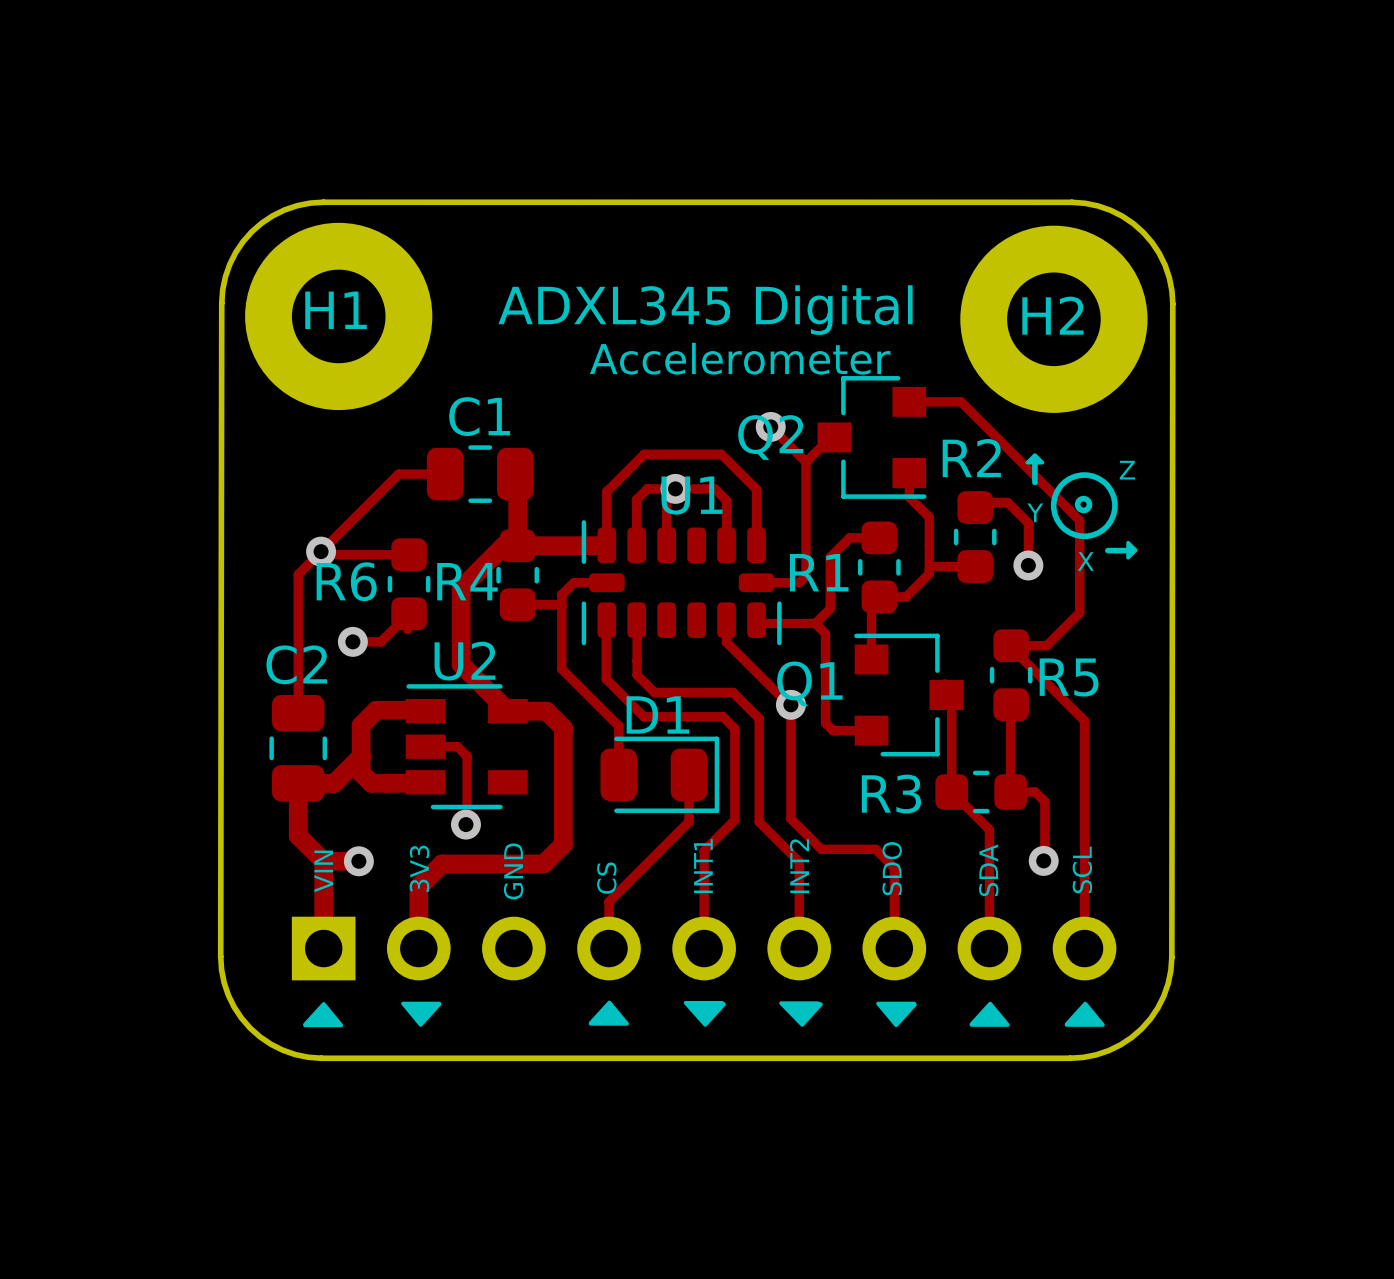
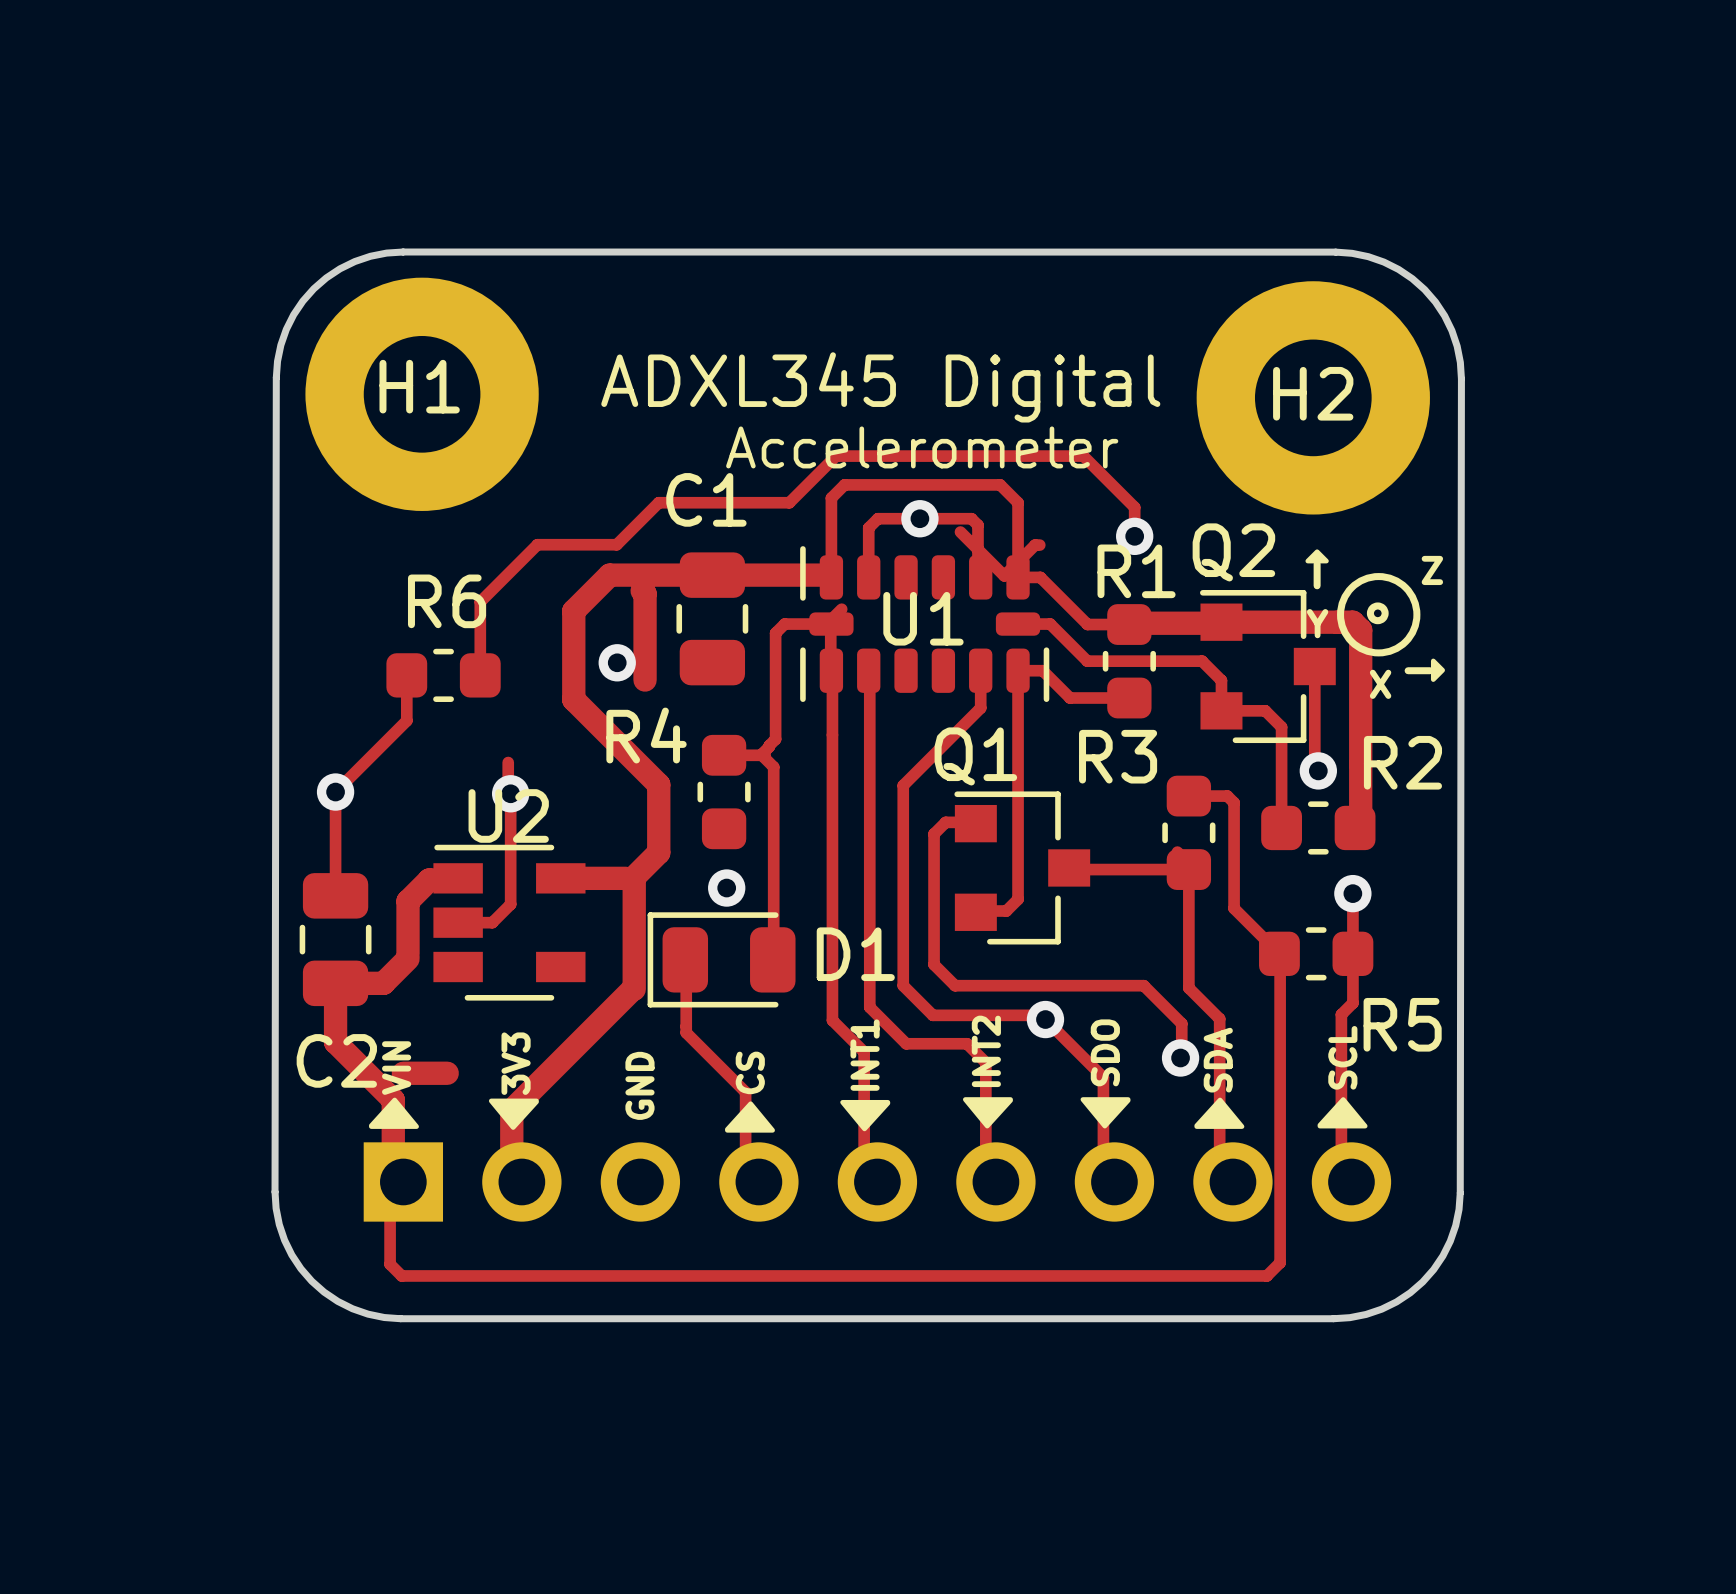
track: (909, 401) (960, 401) (1079, 520) (1079, 612) (1046, 645) (1011, 645) -> none
via position: (770, 426) -> (919, 518)
track: none -> (1134, 536) (1134, 507) (1083, 456) (836, 456) (789, 502) (658, 502) (616, 544) (537, 544) (480, 601) (480, 675)
via: none -> (1134, 536)
Q2 name position: Q2 (770, 437) -> Q2 (1233, 552)
Q2 rotation: 0° (872, 437) -> 180° (1267, 666)
Q2 position: (872, 437) -> (1267, 666)
drawing position: (1034, 458) -> (1317, 556)
track: (805, 462) (805, 575) (799, 582) (756, 582) -> none
track: none -> (868, 577) (868, 527) (877, 518) (971, 518) (977, 525) (977, 574) (980, 577)
line: (1034, 464) (1034, 482) -> (1317, 563) (1317, 585)
text position: Z (1127, 470) -> Z (1432, 570)
track: (909, 472) (909, 497) (929, 517) (929, 573) (906, 596) (879, 596) (871, 604) (871, 659) -> none
track: (445, 474) (398, 474) (298, 574) (298, 713) -> none
C1 rotation: 0° (480, 474) -> 90° clockwise (712, 618)
C1 position: (480, 474) -> (712, 618)
via: (675, 488) -> none
U1 name position: U1 (691, 495) -> U1 (923, 618)
track: none -> (811, 624) (784, 624) (775, 633) (775, 739) (762, 754) (773, 767) (773, 935)
track: none -> (1129, 623) (1352, 622) (1360, 630) (1360, 822) (1355, 827)
track: none -> (1129, 624) (1087, 624) (1040, 577) (1018, 577) (1018, 502) (1000, 484) (844, 484) (831, 498) (831, 577) (829, 575) (609, 575) (573, 611) (573, 699) (658, 784) (658, 852) (633, 878)
track: (982, 502) (1007, 502) (1028, 523) (1028, 565) -> none
track: none -> (1022, 628) (1018, 624) (1050, 624) (1087, 661) (1202, 661) (1221, 680) (1221, 710) (1265, 710) (1281, 727) (1281, 827)
drawing position: (1083, 504) -> (1377, 613)
drawing position: (1084, 505) -> (1378, 614)
text position: Y (1035, 512) -> Y (1317, 623)
via: none -> (617, 662)
track: none -> (1314, 666) (1314, 767) (1318, 770)
track: (879, 537) (849, 537) (830, 557) (830, 608) (815, 623) -> none
R2 rotation: 0° (975, 537) -> 90° clockwise (1318, 827)
R2 position: (975, 537) -> (1318, 827)
track: none -> (831, 670) (832, 1020) (864, 1052) (864, 1210)
track: none -> (868, 670) (869, 1007) (906, 1043) (966, 1043) (985, 1062) (985, 1185)
track: none -> (980, 670) (980, 708) (903, 785) (903, 985) (932, 1015) (1045, 1015) (1045, 1019) (1103, 1077) (1104, 1185)
track: (602, 545) (503, 545) (461, 588) (461, 664) (507, 711) (546, 711) (563, 727) (563, 844) (543, 863) (442, 863) (418, 887) (418, 948) -> none
track: (606, 545) (606, 491) (644, 454) (721, 454) (756, 489) (756, 545) -> none
track: (636, 545) (636, 499) (647, 488) (714, 488) (726, 500) (726, 545) -> none
track: none -> (400, 681) (406, 675) (406, 720) (335, 792) (335, 895)
line: (1107, 550) (1125, 550) -> (1408, 670) (1430, 670)
drawing position: (1131, 550) -> (1437, 670)
track: (321, 551) (324, 554) (409, 554) -> none
via: (321, 551) -> none
track: none -> (1129, 698) (1070, 698) (1042, 670) (1018, 670) (1018, 899) (1006, 911) (976, 911)
text position: X (1085, 561) -> X (1380, 684)
via position: (1028, 565) -> (1318, 770)
track: (975, 566) (932, 566) (929, 569) -> none
R1 position: (879, 567) -> (1129, 661)
R1 name position: R1 (819, 572) -> R1 (1136, 571)
R4 position: (517, 575) -> (724, 792)
R4 name position: R4 (467, 581) -> R4 (646, 735)
track: (606, 582) (573, 582) (561, 594) (561, 669) (618, 726) (618, 774) -> none
U1 position: (681, 582) -> (924, 624)
R6 rotation: 0° (409, 584) -> 90° clockwise (443, 675)
R6 position: (409, 584) -> (443, 675)
track: (517, 604) (559, 604) (561, 606) -> none
track: (409, 613) (380, 641) (352, 641) -> none
track: (726, 620) (726, 642) (790, 704) (790, 818) (821, 849) (875, 849) (894, 868) (894, 948) -> none
track: (756, 620) (759, 623) (815, 623) -> none
track: (815, 623) (825, 633) (825, 723) (832, 730) (871, 730) -> none
via: none -> (335, 792)
track: (1011, 635) (1011, 647) (1084, 720) (1084, 948) -> none
track: none -> (1191, 793) (1188, 796) (1227, 796) (1234, 802) (1234, 908) (1280, 954) (1280, 1262) (1266, 1275) (401, 1275) (390, 1264) (390, 1210)
track: none -> (510, 793) (510, 904) (492, 922) (458, 922)
via: none -> (510, 793)
track: (606, 637) (606, 679) (643, 716) (722, 716) (734, 728) (734, 820) (704, 850) (704, 948) -> none
track: (637, 637) (637, 675) (654, 692) (732, 692) (759, 718) (759, 821) (799, 862) (799, 948) -> none
via: (352, 641) -> none
track: none -> (976, 822) (945, 822) (934, 834) (934, 964) (955, 985) (1143, 985) (1181, 1023) (1180, 1058)
C2 name position: C2 (296, 664) -> C2 (336, 1060)
R5 rotation: 0° (1011, 675) -> 90° clockwise (1316, 953)
R5 position: (1011, 675) -> (1316, 953)
Q1 name position: Q1 (809, 683) -> Q1 (975, 756)
track: (946, 689) (951, 695) (951, 792) (989, 829) (989, 948) -> none
Q1 position: (908, 695) -> (1022, 867)
track: none -> (1069, 867) (1070, 869) (1188, 869) (1188, 988) (1219, 1018) (1219, 1210)
track: none -> (560, 878) (633, 878)
track: none -> (633, 878) (634, 989) (511, 1110) (511, 1185)
via: (790, 704) -> none
track: (1010, 705) (1010, 792) (1035, 792) (1044, 801) (1044, 855) -> none
track: none -> (465, 879) (429, 879) (408, 901) (408, 958) (383, 983) (335, 983) (335, 1042) (393, 1099) (393, 1185)
track: (425, 710) (376, 710) (361, 725) (361, 772) (371, 783) (425, 783) -> none
via: none -> (726, 888)
D1 name position: D1 (657, 714) -> D1 (855, 954)
track: none -> (1352, 893) (1352, 1003) (1341, 1014) (1341, 1185)
via: none -> (1352, 893)
track: (425, 746) (457, 746) (467, 756) (465, 824) -> none
U2 position: (466, 746) -> (509, 922)
C2 position: (298, 748) -> (335, 939)
track: none -> (686, 935) (686, 1032) (745, 1092) (745, 1210)
track: (361, 756) (334, 783) (298, 783) (298, 835) (323, 861) (323, 948) -> none
D1 rotation: 0° (659, 774) -> 180° (721, 959)
D1 position: (659, 774) -> (721, 959)
track: (688, 774) (688, 821) (609, 901) (609, 948) -> none
R3 rotation: 0° (981, 792) -> 90° clockwise (1188, 832)
R3 position: (981, 792) -> (1188, 832)
via: none -> (1045, 1019)
via: (465, 824) -> none
via: none -> (1180, 1058)
via: (1043, 860) -> none
via: (358, 861) -> none
text position: INT1 (703, 866) -> INT1 (865, 1055)
text position: INT2 (799, 866) -> INT2 (986, 1051)
text position: 3V3 (419, 868) -> 3V3 (516, 1063)
text position: SDO (892, 868) -> SDO (1105, 1052)
text position: SCL (1082, 869) -> SCL (1342, 1057)
text position: SDA (988, 870) -> SDA (1218, 1060)
text position: VIN (323, 871) -> VIN (396, 1068)
text position: CS (606, 878) -> CS (750, 1072)
drawing: none -> [962, 1097, 1013, 1129]
drawing: none -> [1080, 1097, 1131, 1129]
drawing: none -> [1194, 1097, 1245, 1129]
drawing: none -> [1317, 1097, 1368, 1129]
drawing: none -> [840, 1099, 891, 1132]
drawing: [683, 1000, 726, 1027] -> none
drawing: [779, 1001, 823, 1027] -> none
drawing: [876, 1001, 917, 1028] -> none
drawing: [969, 1001, 1010, 1027] -> none
drawing: [1064, 1001, 1105, 1027] -> none
drawing position: (608, 1013) -> (749, 1117)
drawing position: (323, 1014) -> (393, 1113)
drawing position: (421, 1014) -> (513, 1114)

